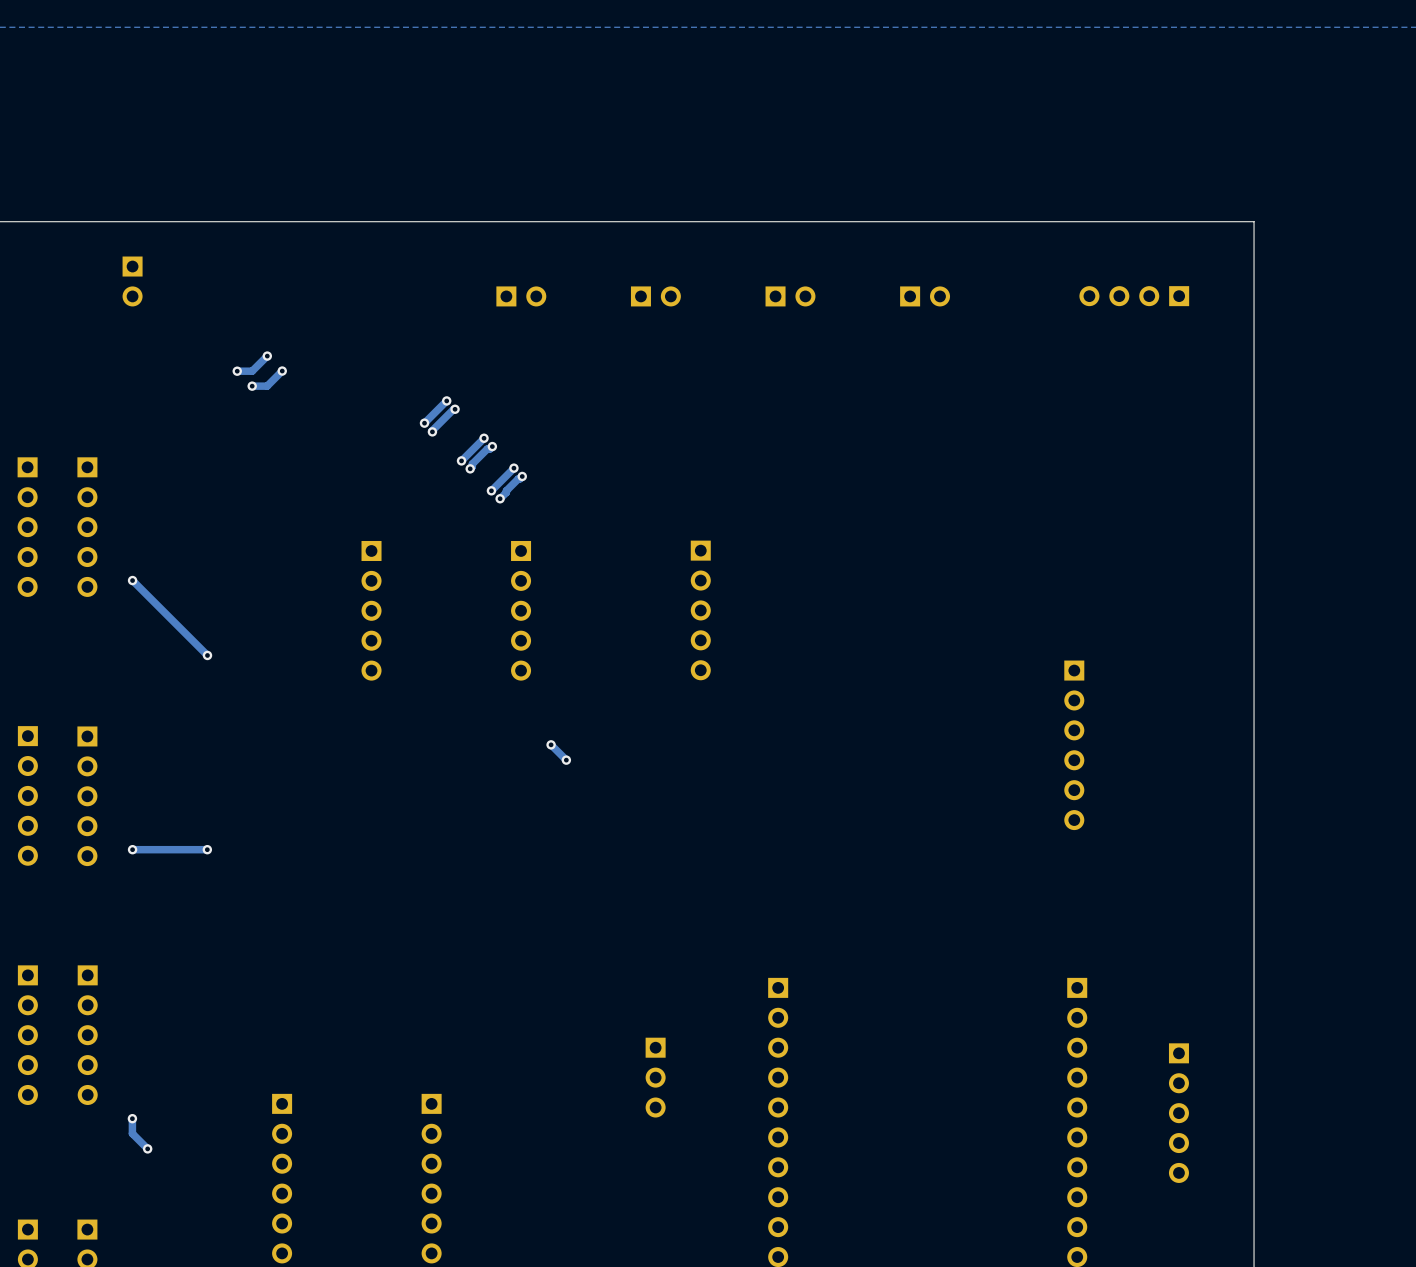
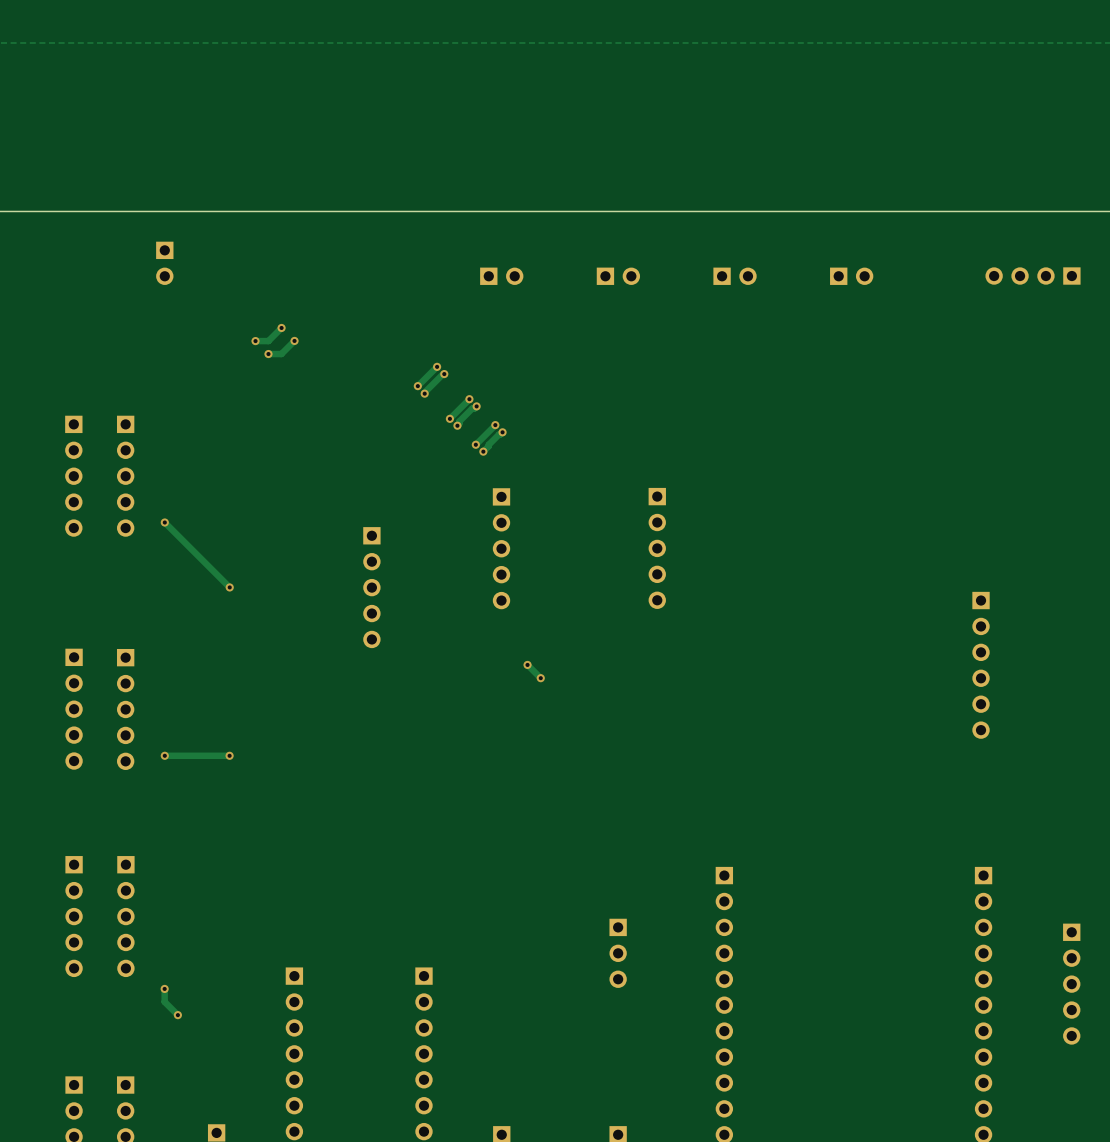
part position: (371, 610) -> (371, 587)

